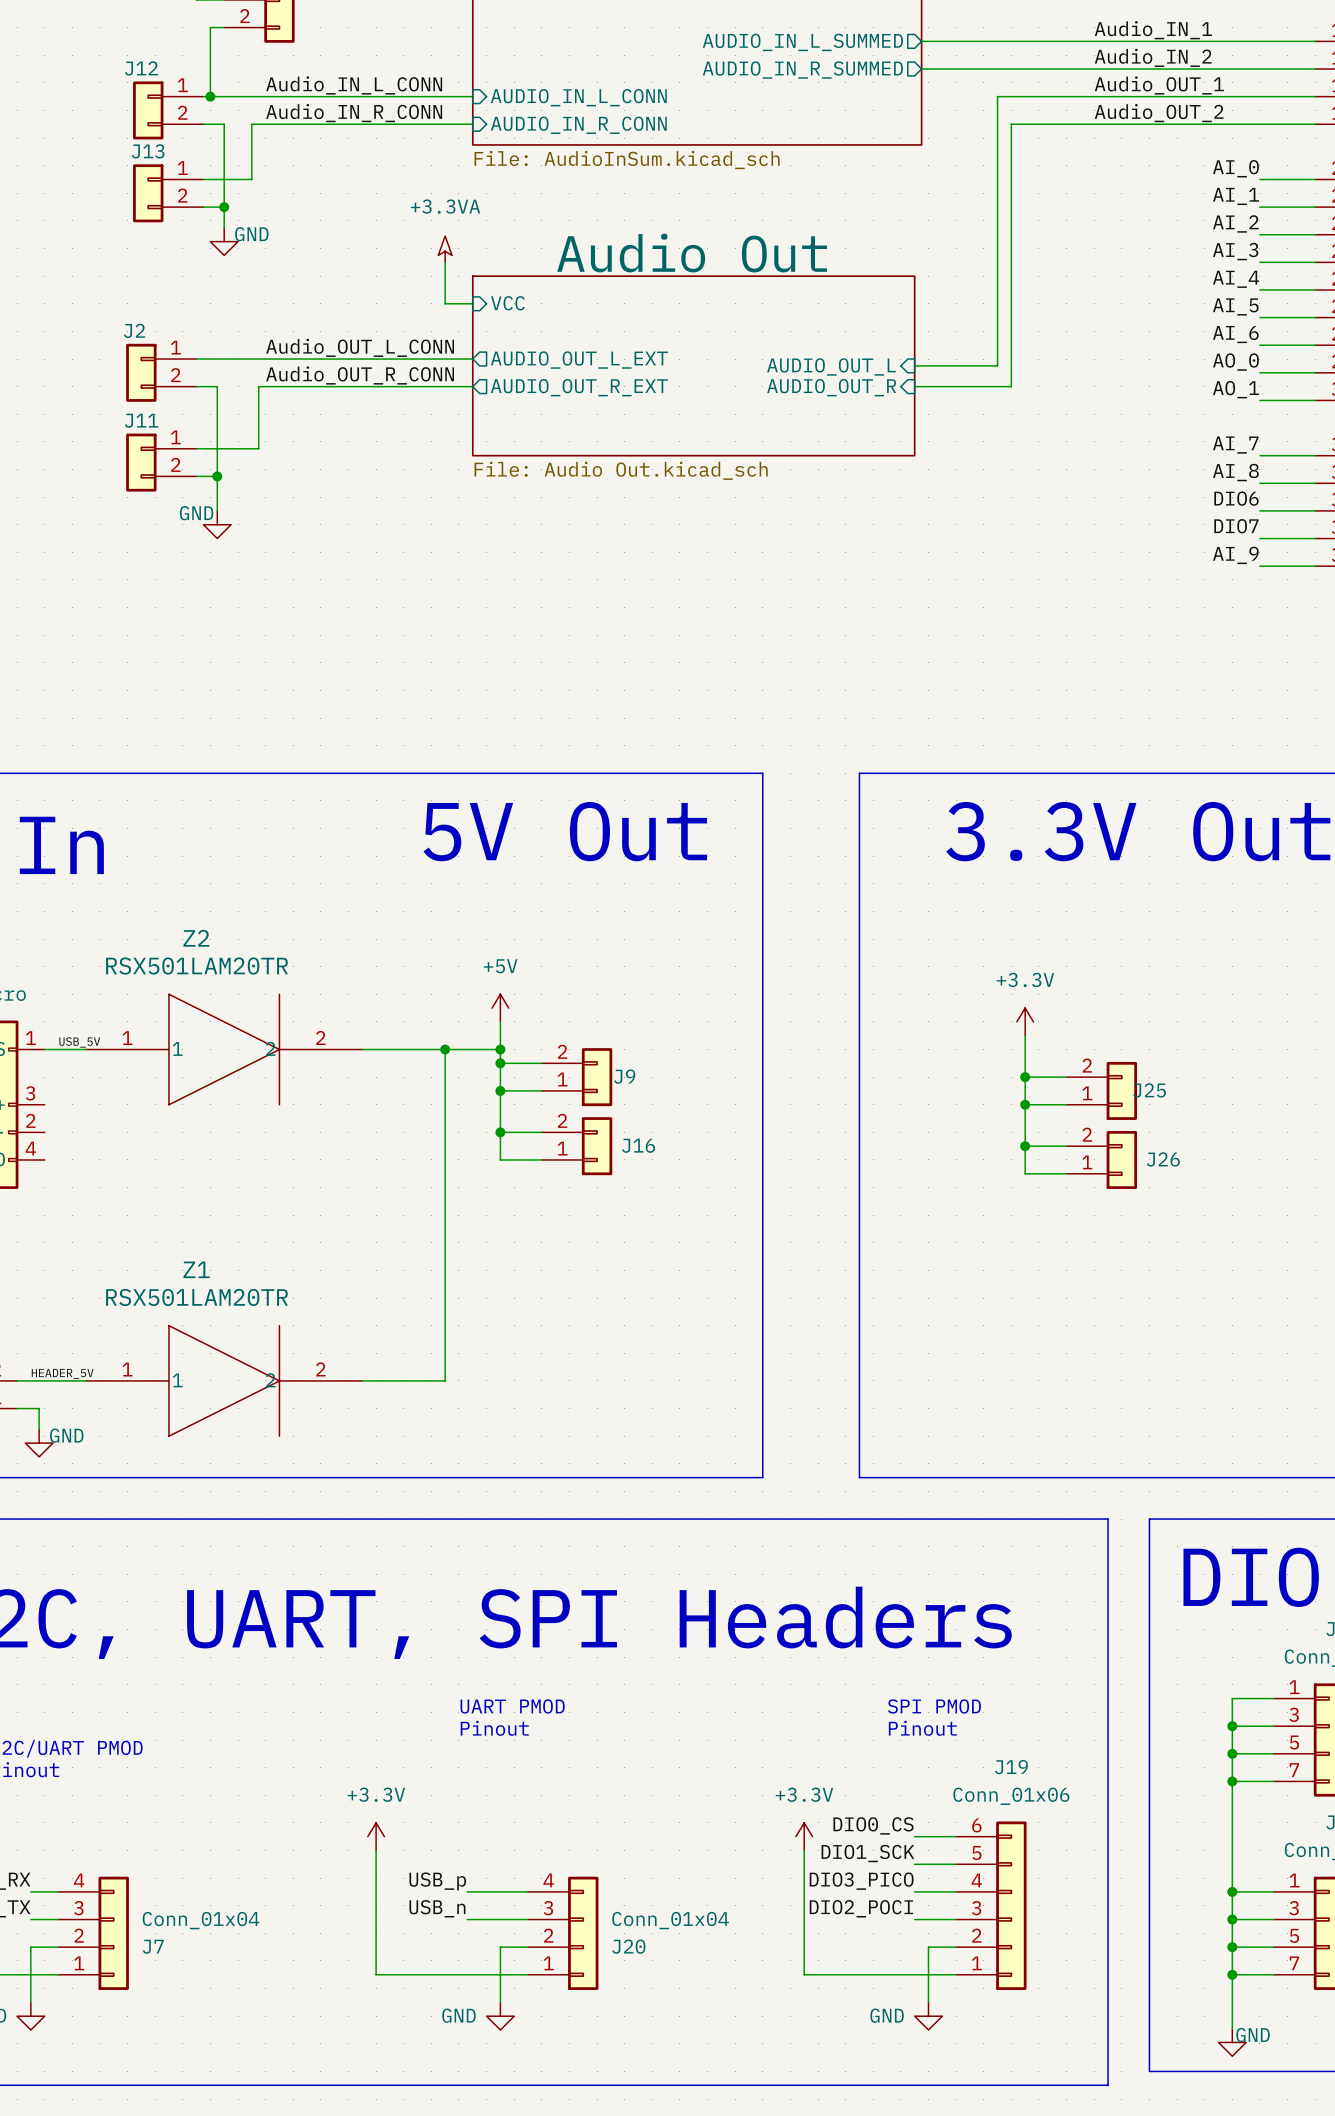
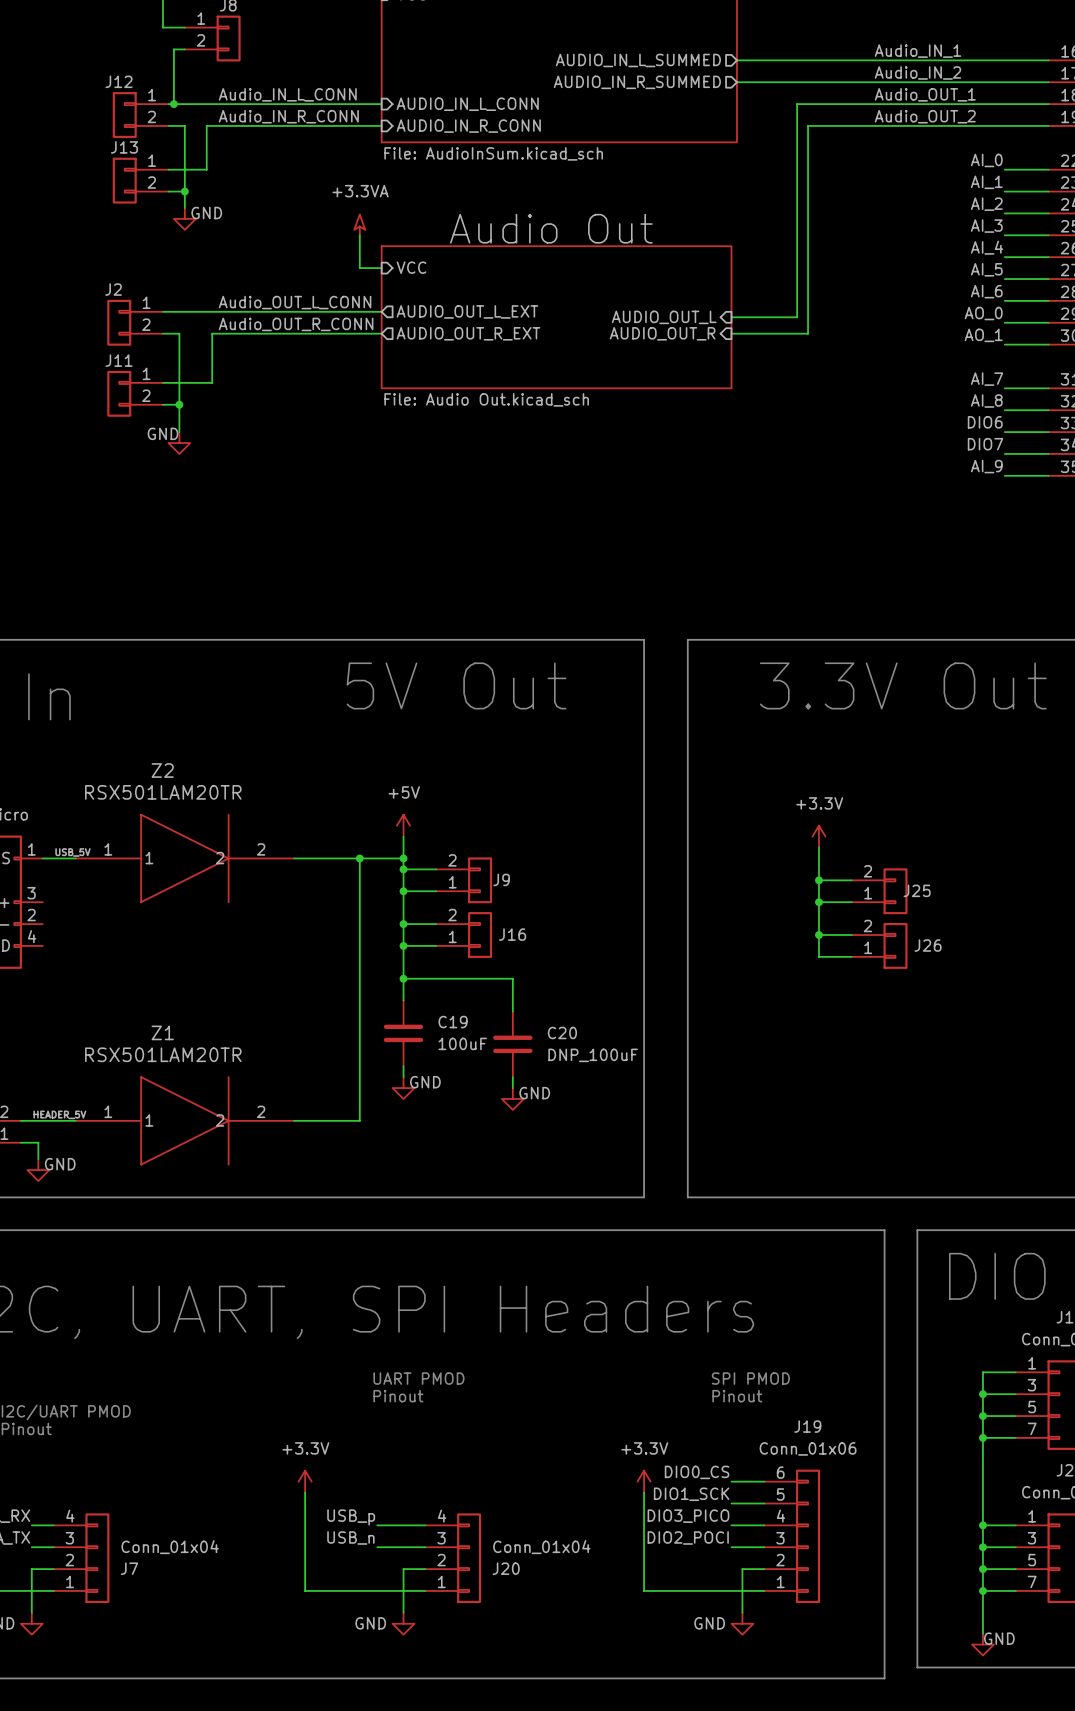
line: (762, 773) (762, 1477) -> (611, 639) (644, 639) (644, 1197) (611, 1197)
wire: none -> (403, 945) (403, 1000)
junction: none -> (403, 945)
wire: none -> (403, 978) (512, 978) (512, 1011)
junction: none -> (403, 978)
C19: none -> 100uF (403, 1033)
C20: none -> DNP_100uF (512, 1044)
wire: none -> (403, 1066) (403, 1077)
wire: none -> (512, 1077) (512, 1088)
power symbol: none -> GND (403, 1088)
power symbol: none -> GND (512, 1098)

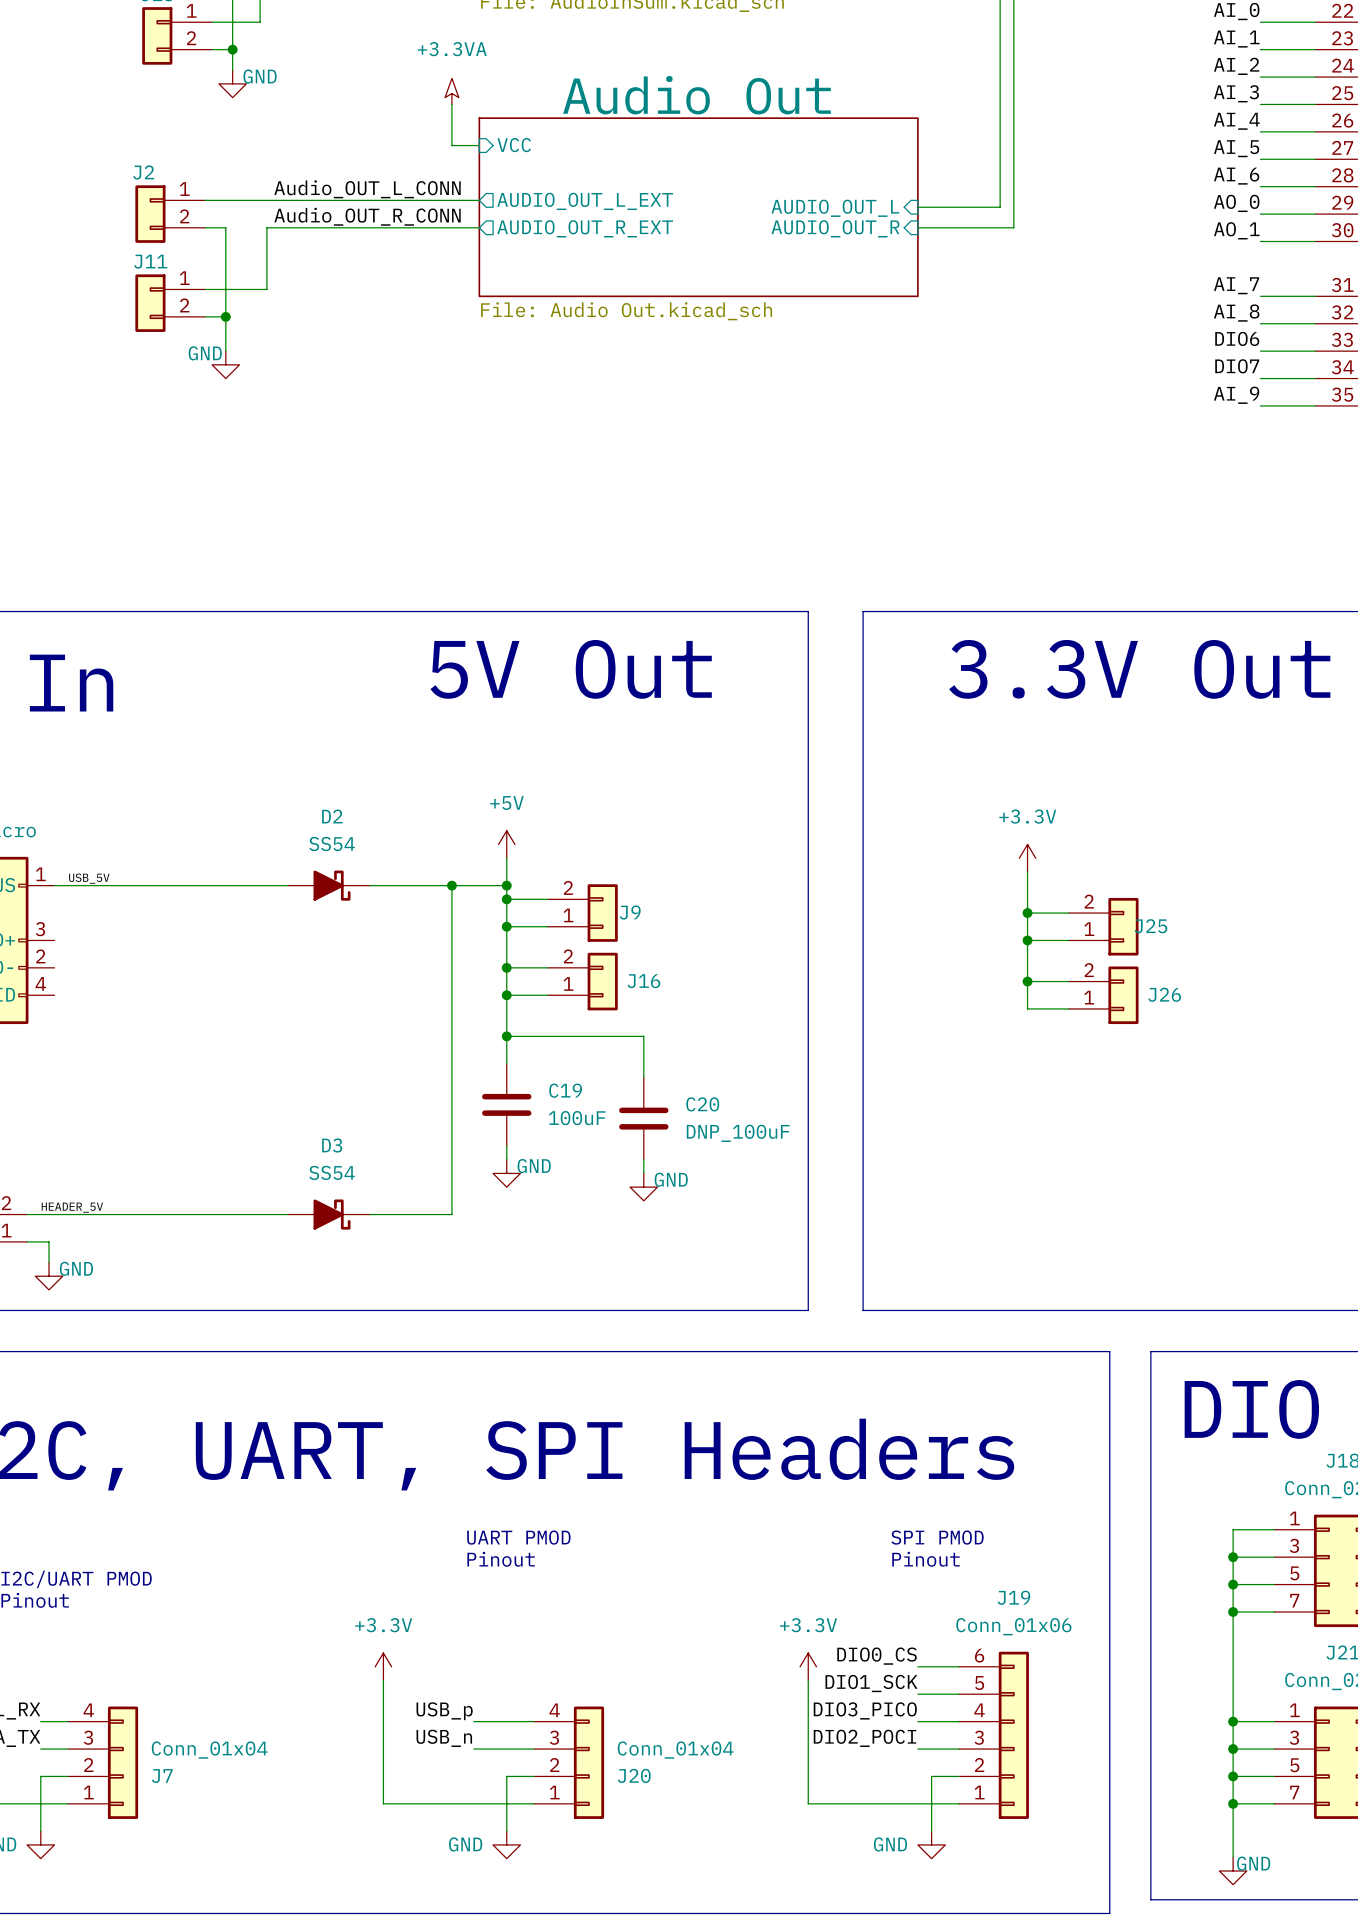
wire: none -> (95, 885) (287, 885)
Z2: RSX501LAM20TR (184, 858) -> none
D2: none -> SS54 (328, 885)
wire: none -> (95, 1214) (287, 1214)
Z1: RSX501LAM20TR (184, 1120) -> none
D3: none -> SS54 (328, 1214)

